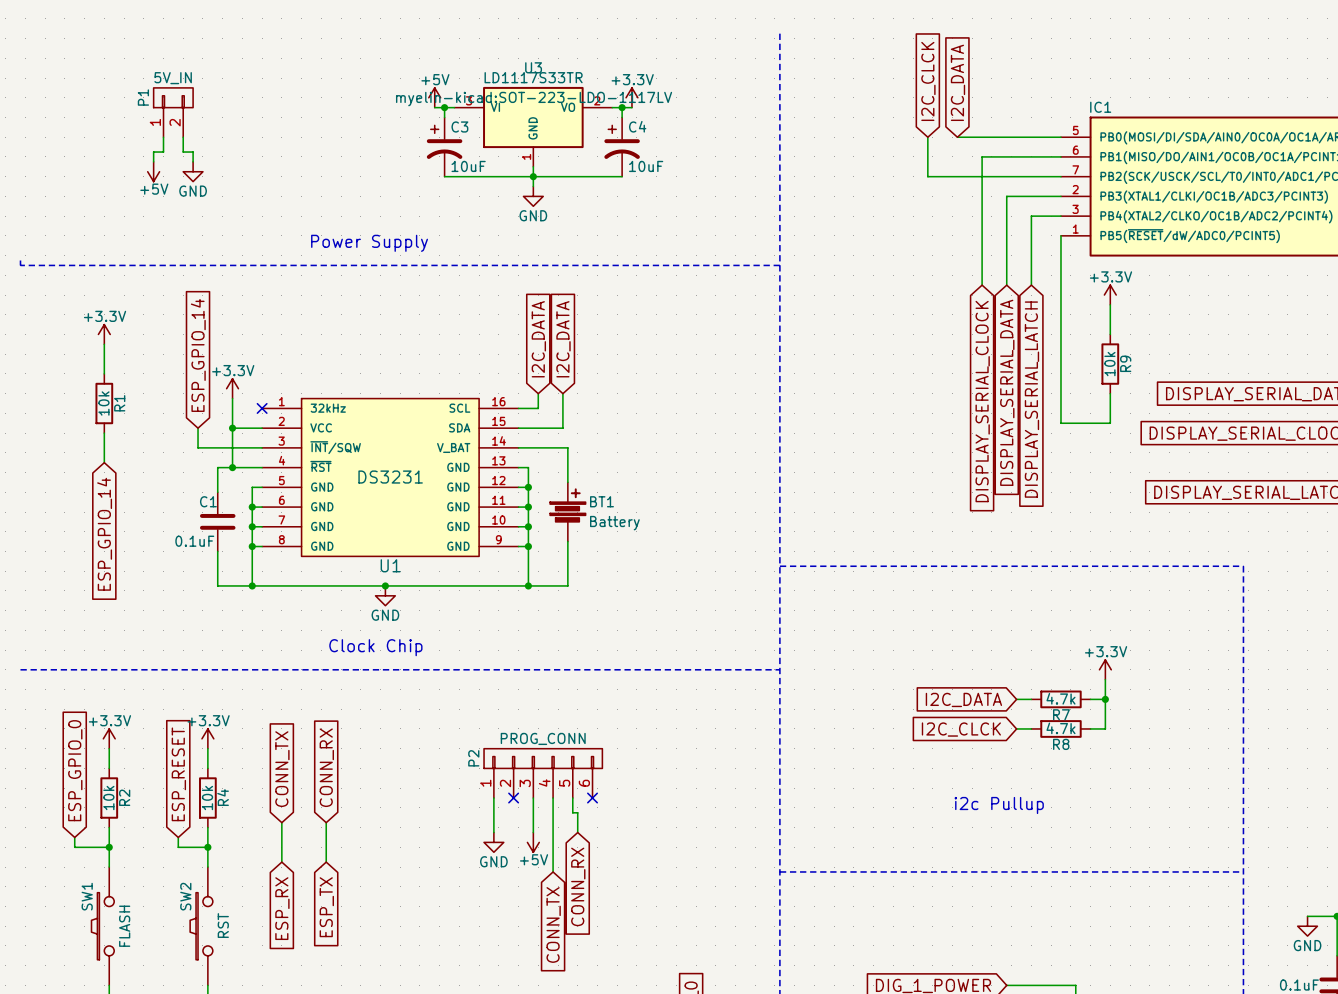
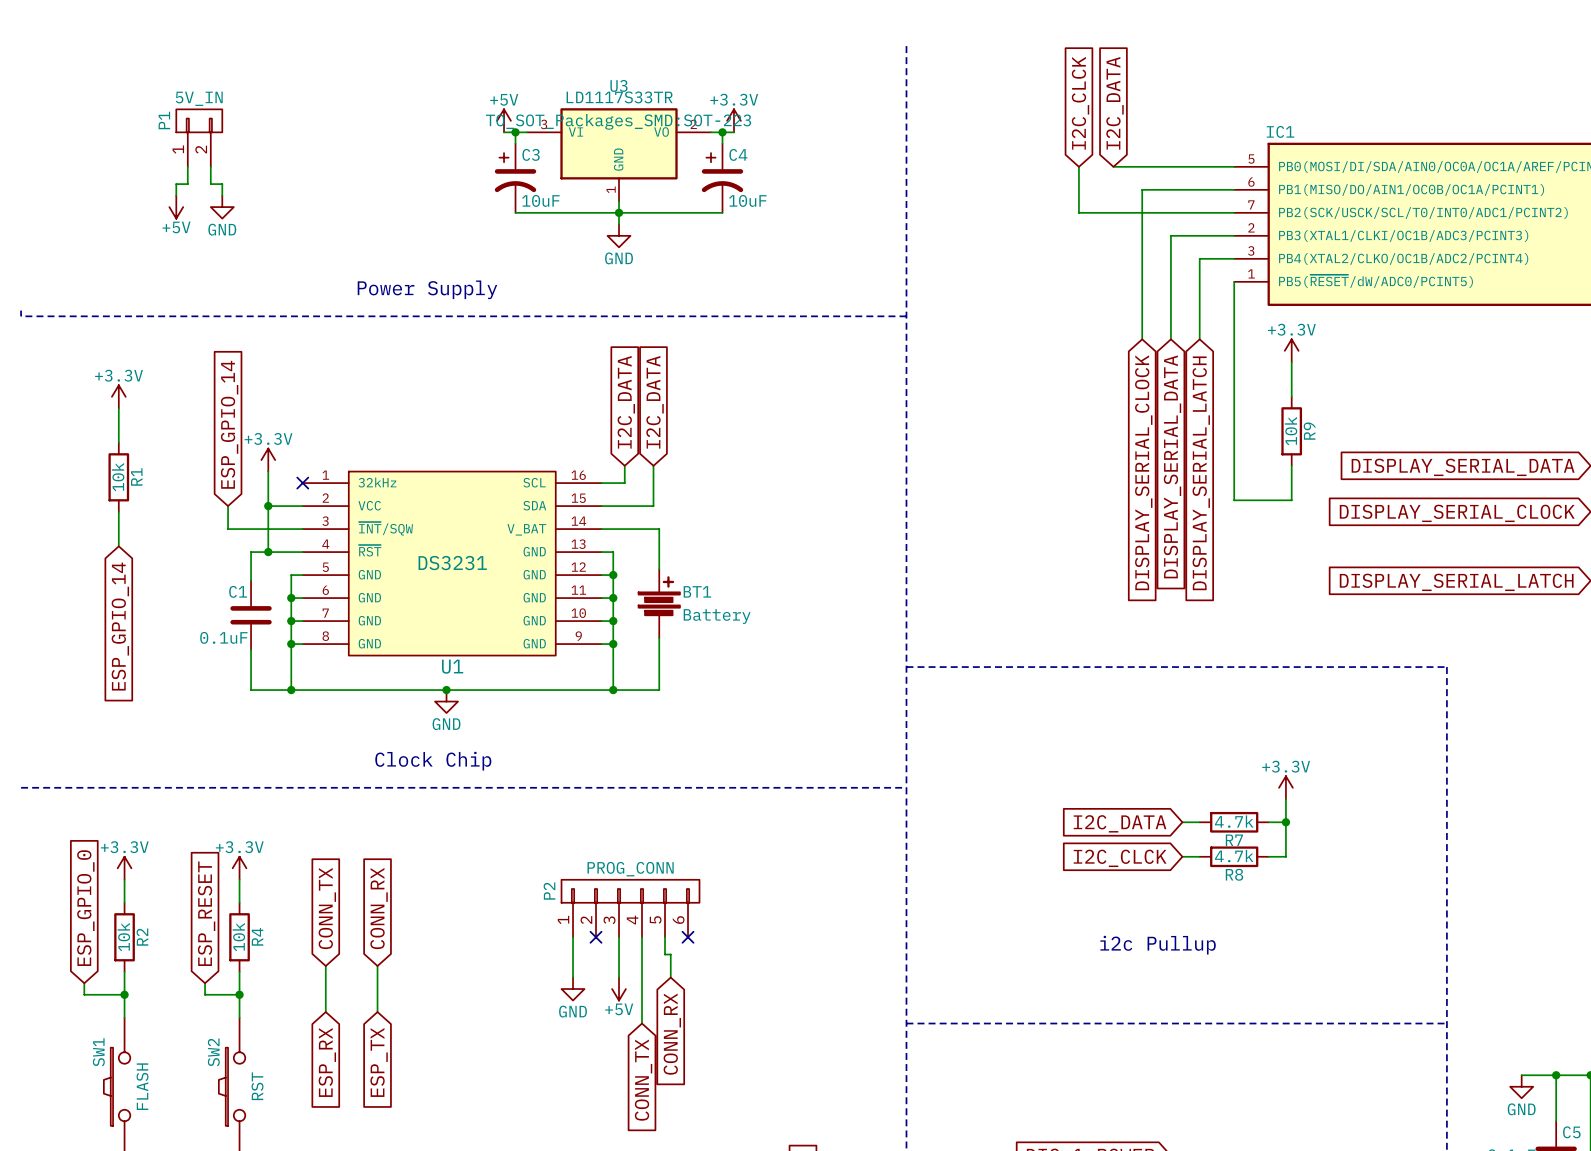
U3 text: myelin-kicad:SOT-223-LDO-1117LV (534, 99) -> TO_SOT_Packages_SMD:SOT-223 (618, 121)

